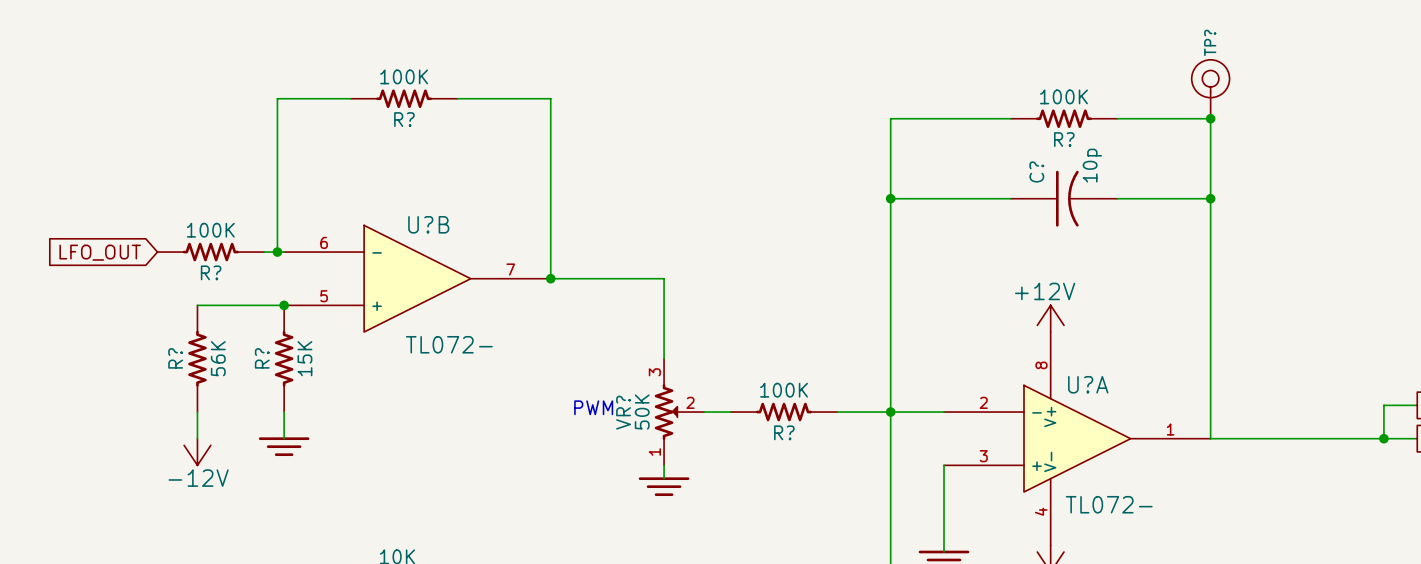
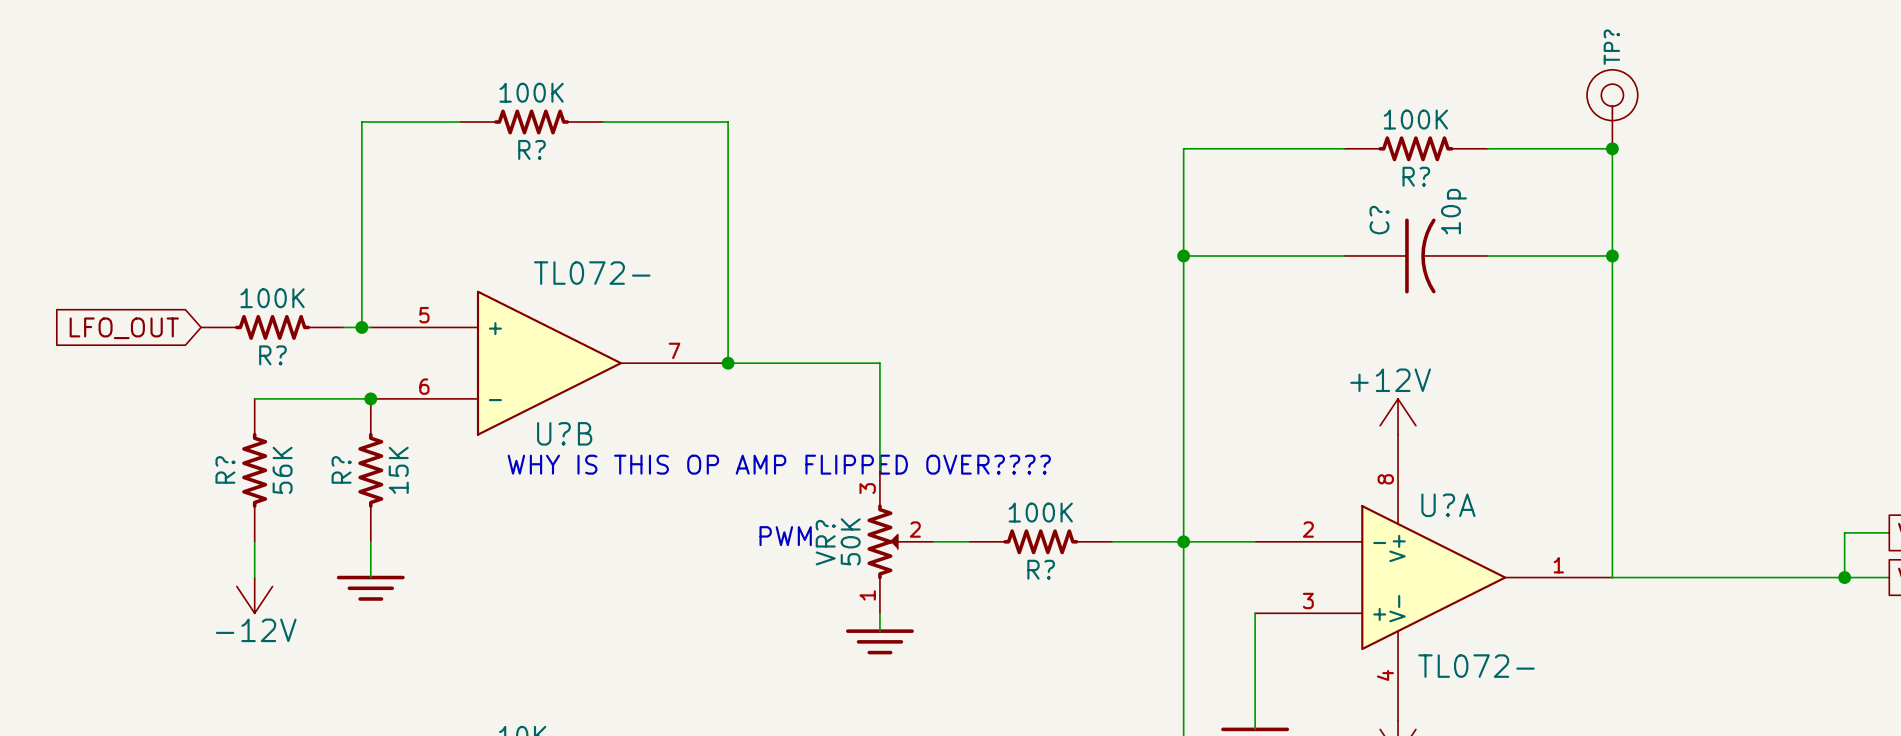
U?B flip: as is (417, 278) -> up-down (549, 363)
text: none -> WHY IS THIS OP AMP FLIPPED OVER???? (779, 464)

